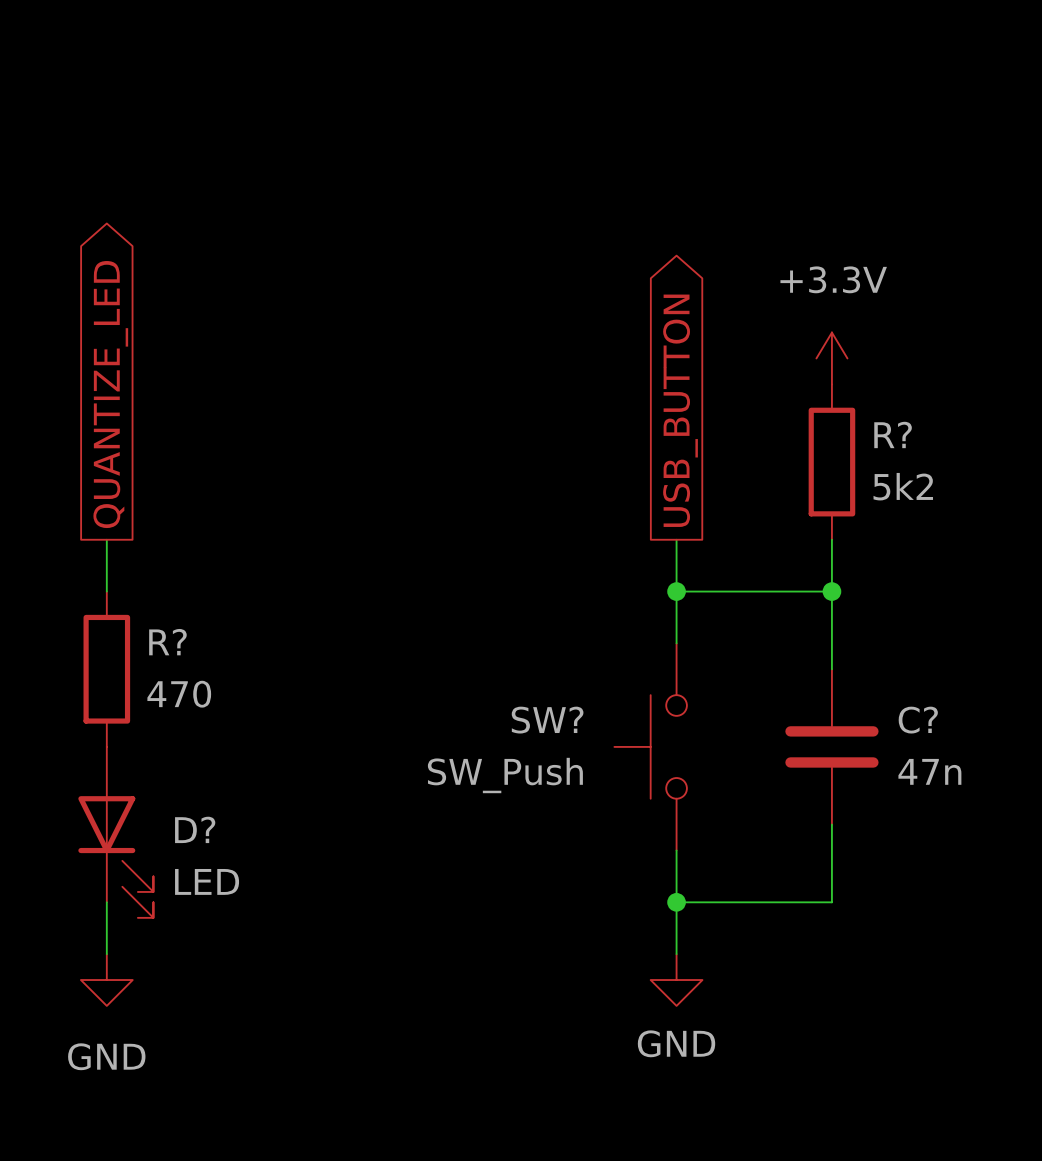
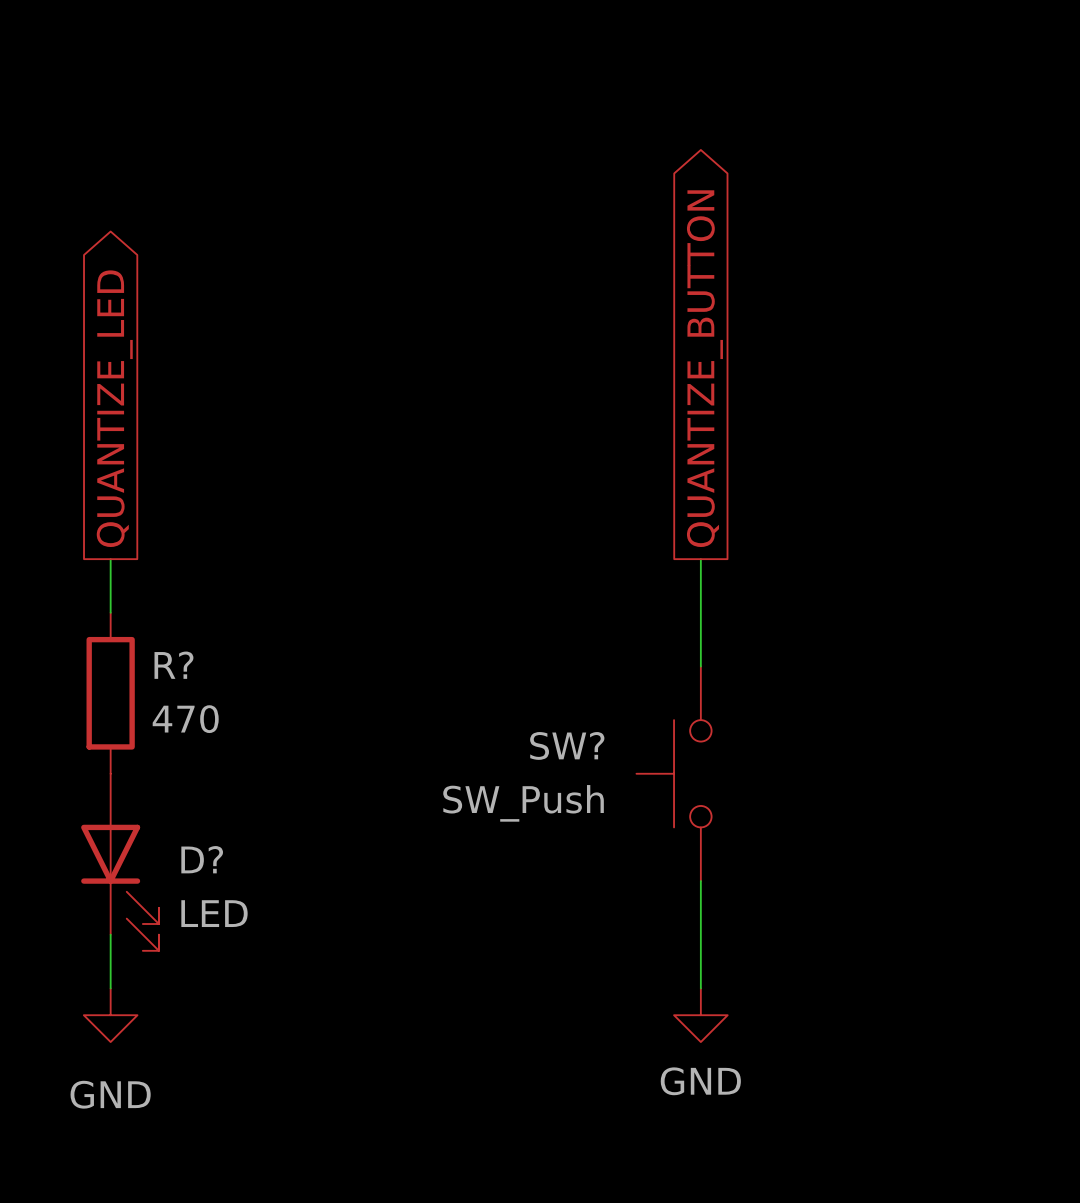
power symbol: +3.3V (831, 358) -> none
global label: USB_BUTTON (680, 410) -> QUANTIZE_BUTTON (704, 368)
R?: 5k2 (831, 462) -> none
wire: (831, 539) (831, 669) -> none
wire: (676, 591) (831, 591) -> none
junction: (676, 591) -> none
junction: (831, 591) -> none
C?: 47n (831, 746) -> none
wire: (831, 824) (831, 902) (676, 902) -> none
junction: (676, 902) -> none

